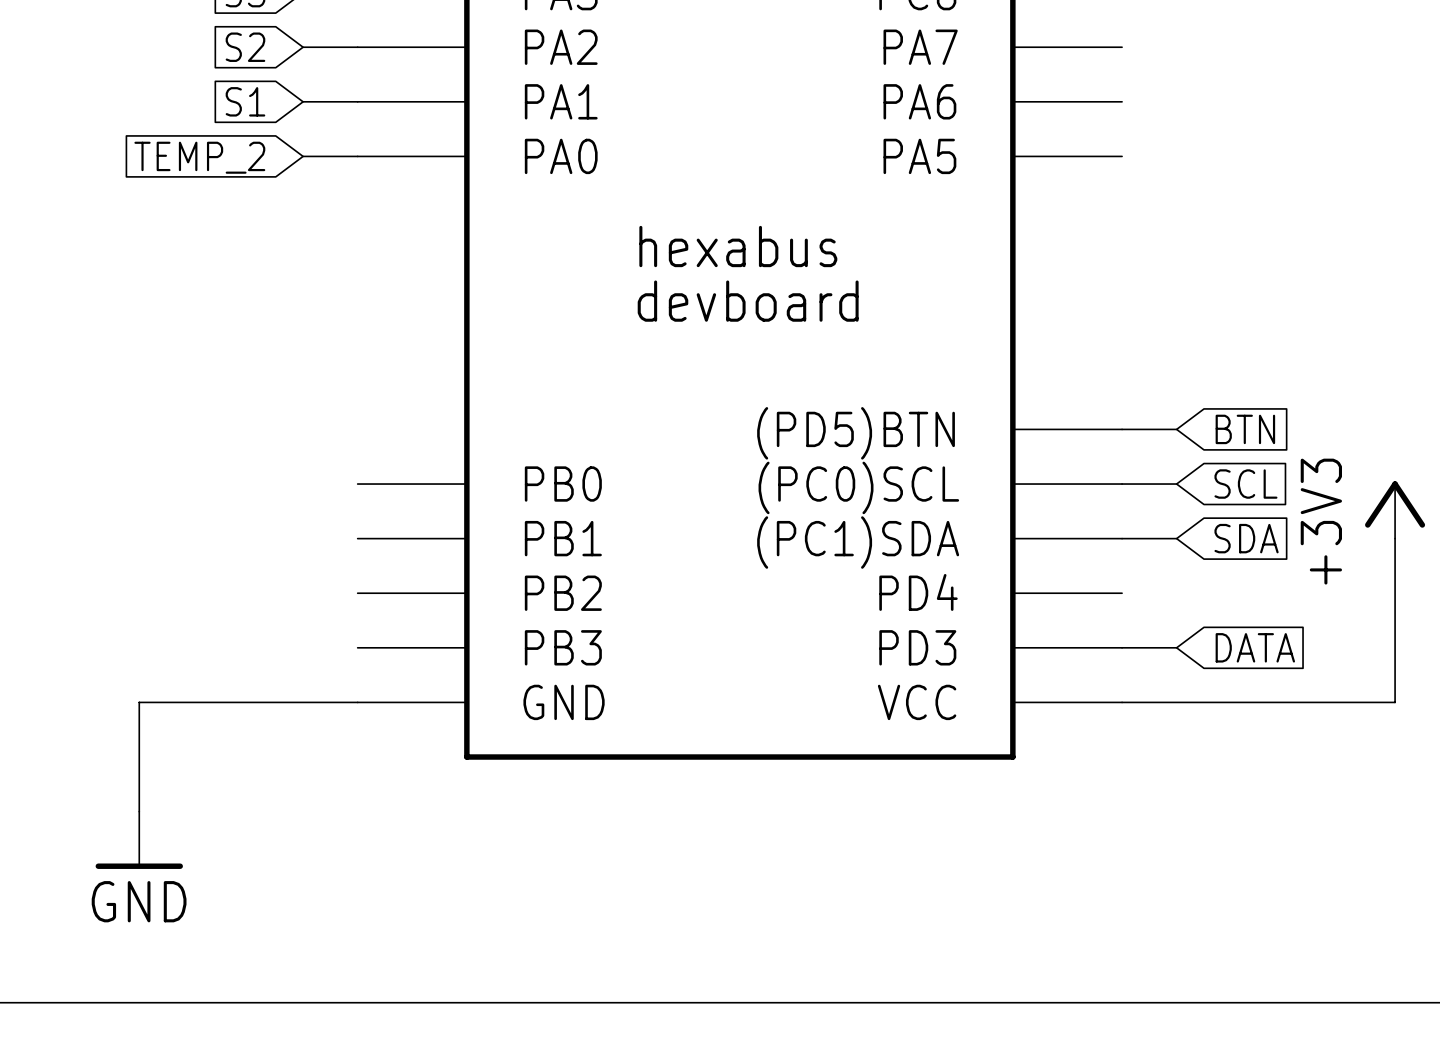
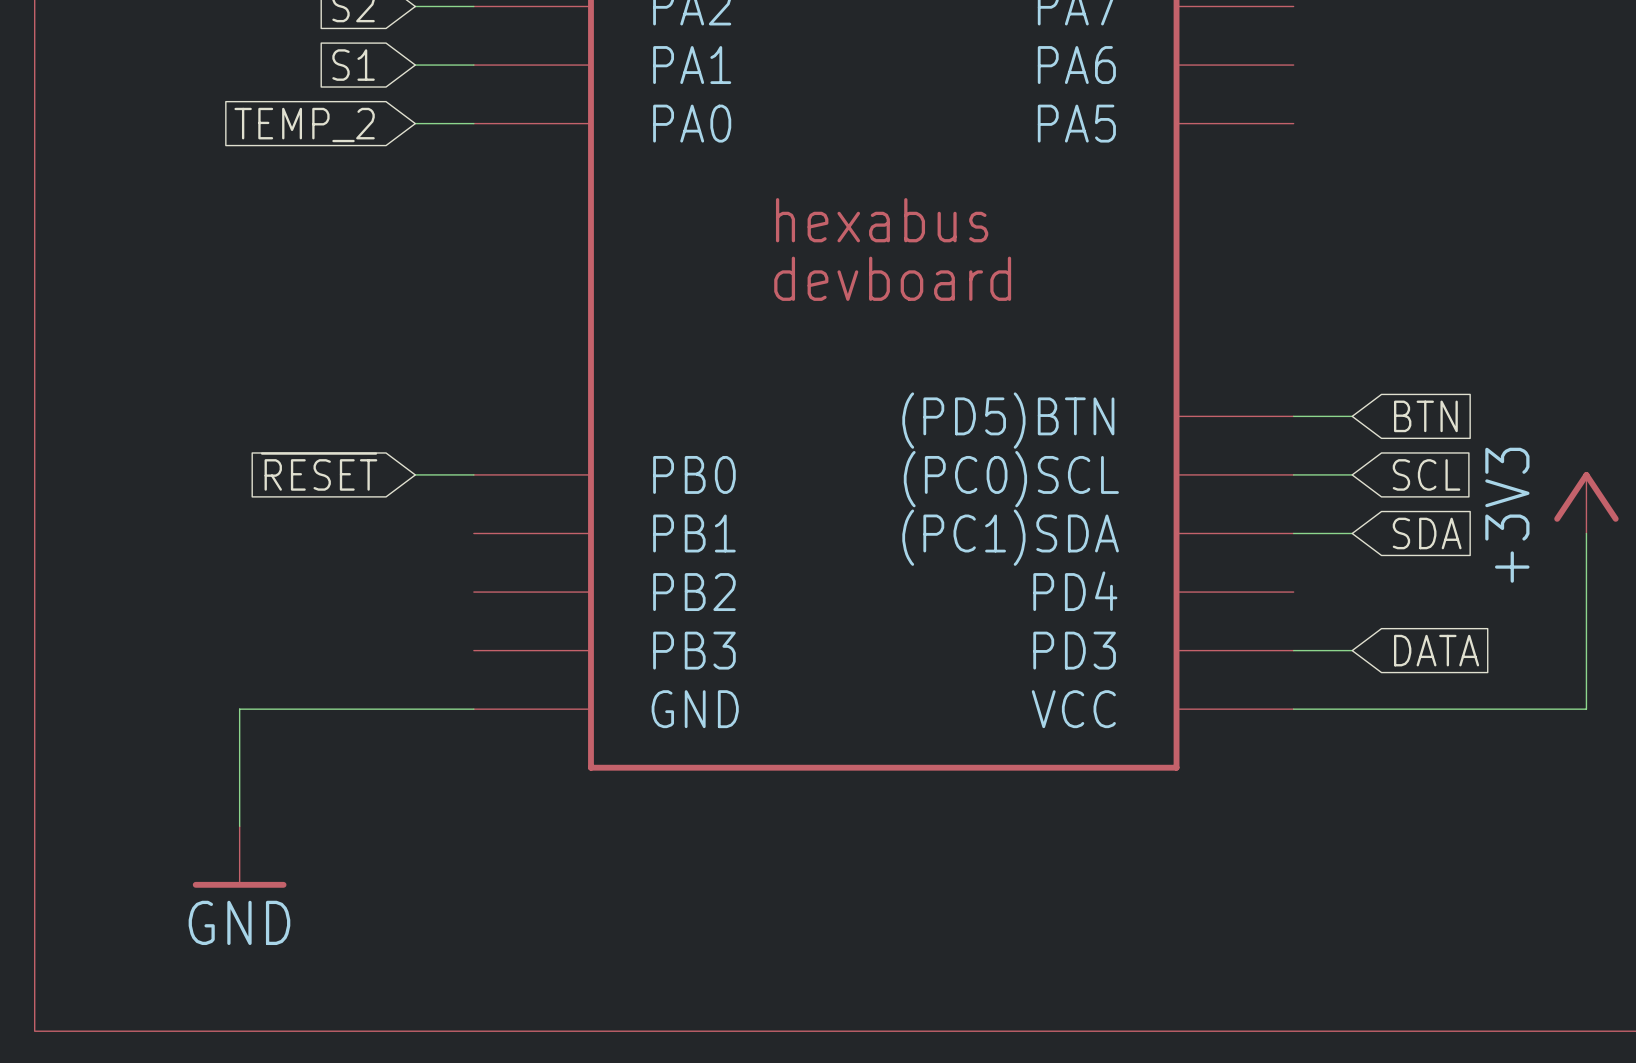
global label: none -> ~{RESET} (319, 471)
wire: none -> (415, 474) (473, 474)

